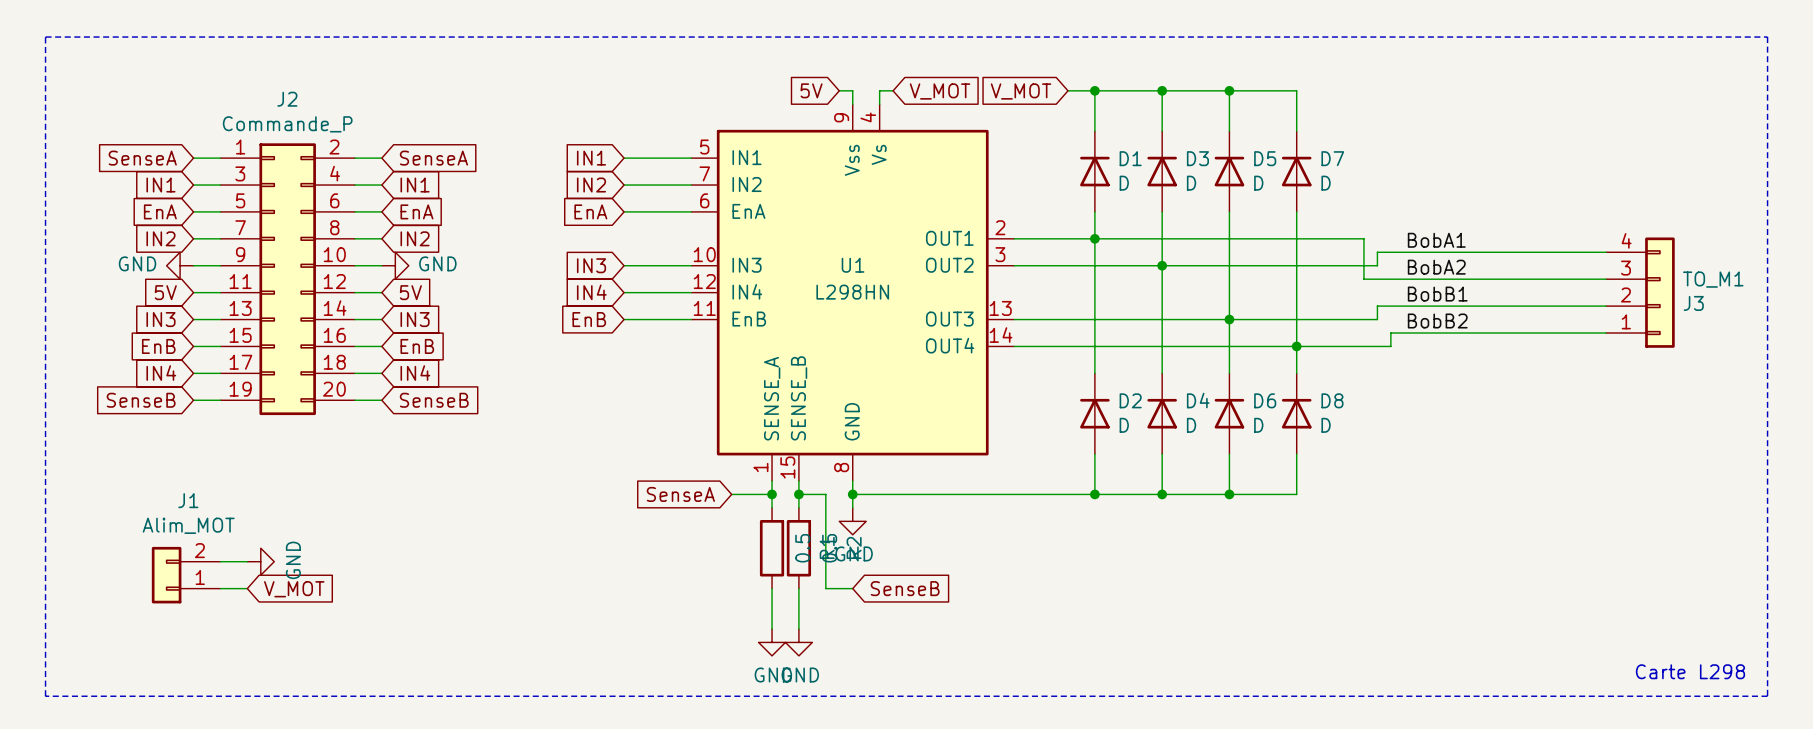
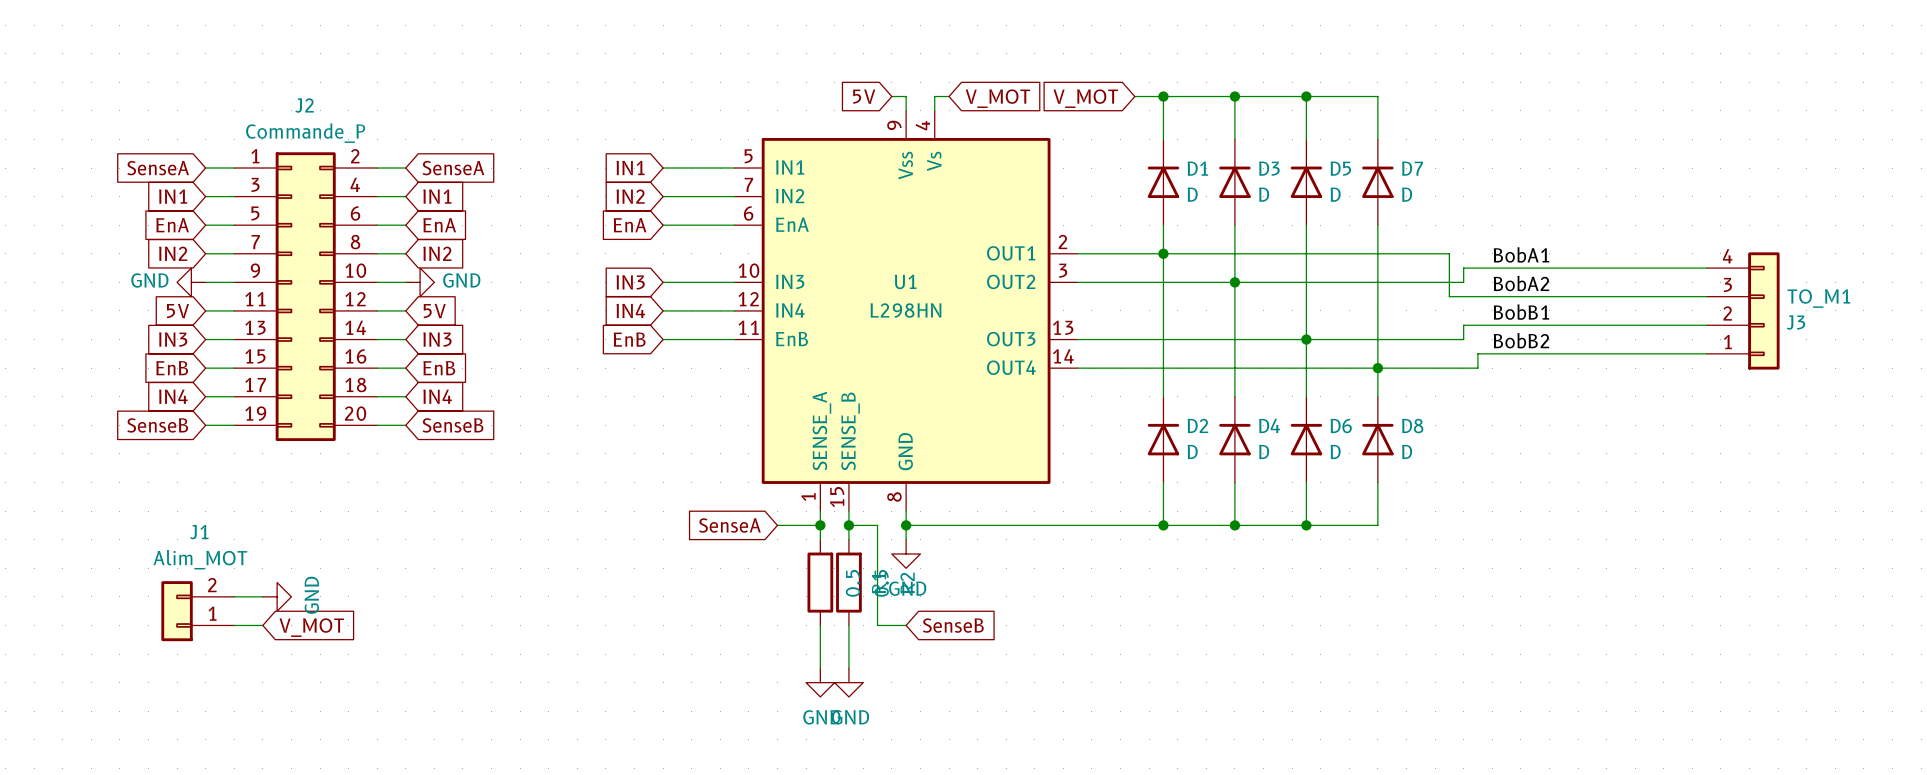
line: (45, 37) (1767, 37) (1767, 696) (45, 696) (45, 37) -> none
text: Carte L298 (1690, 671) -> none

